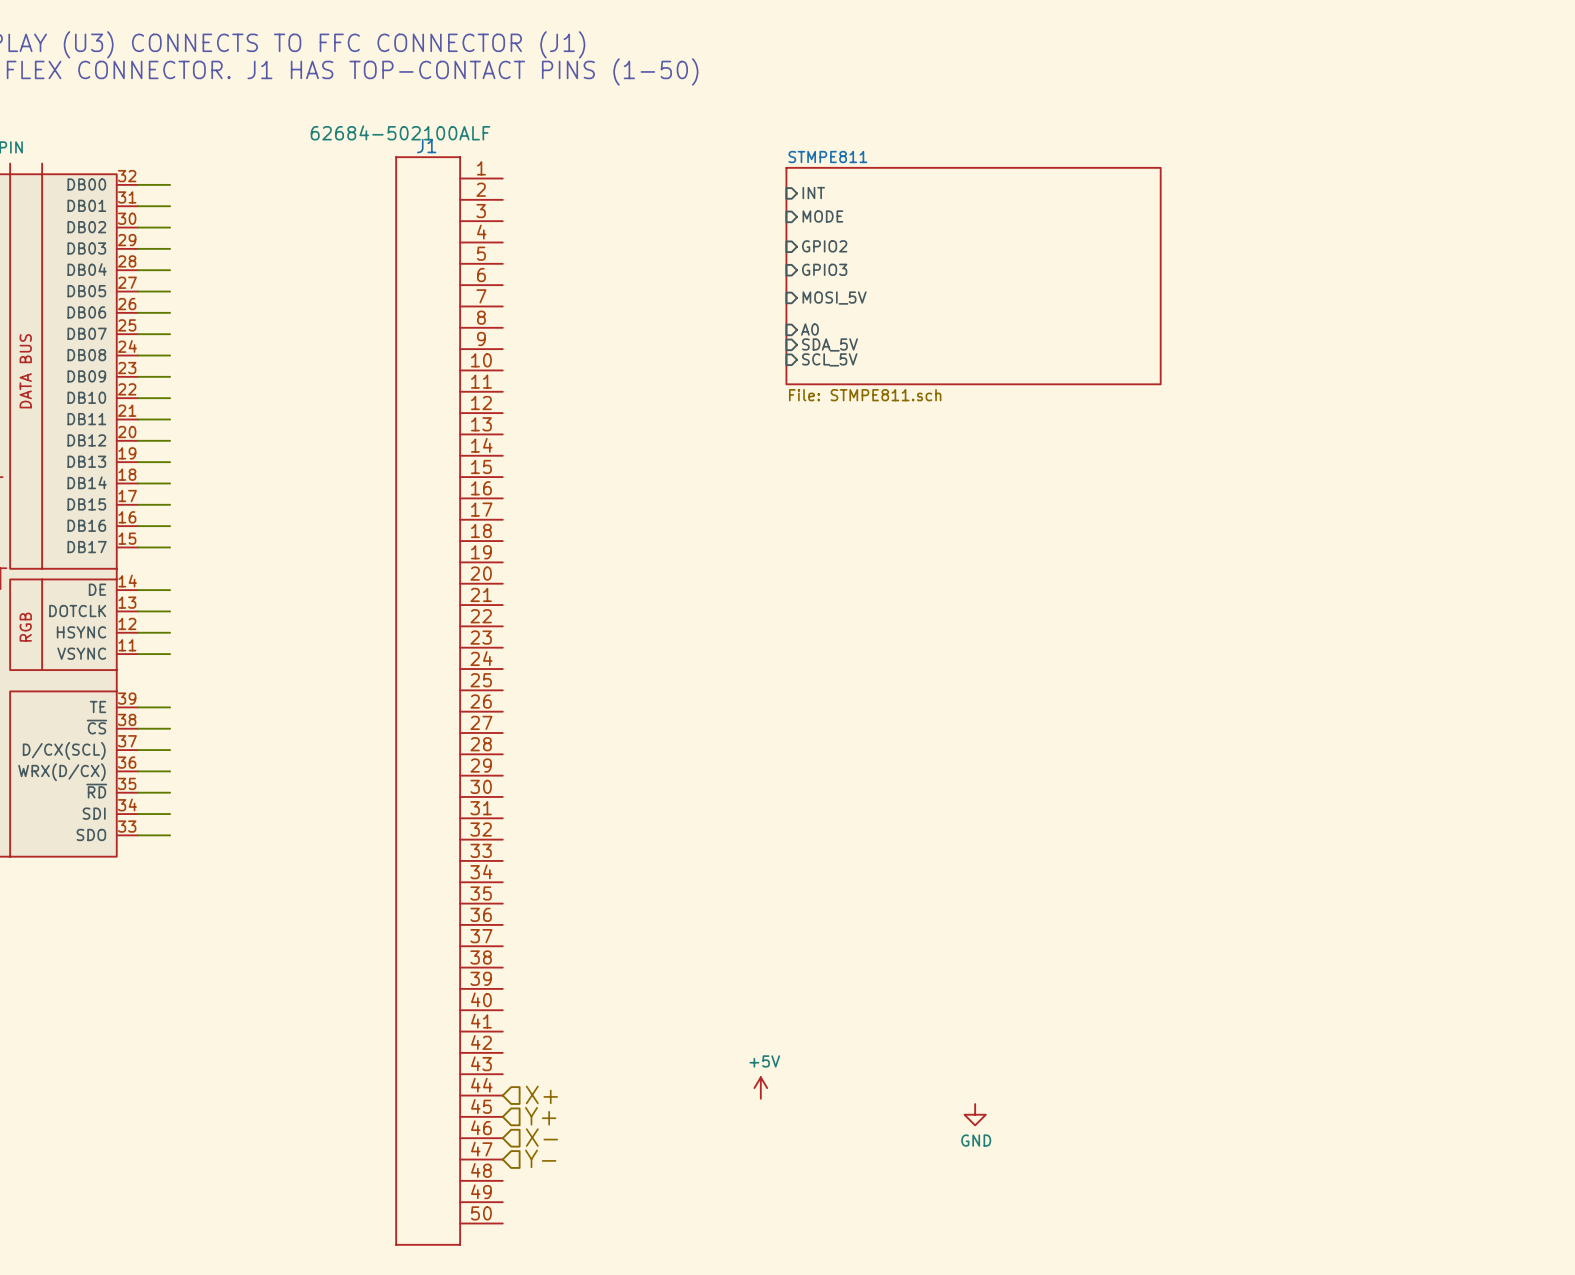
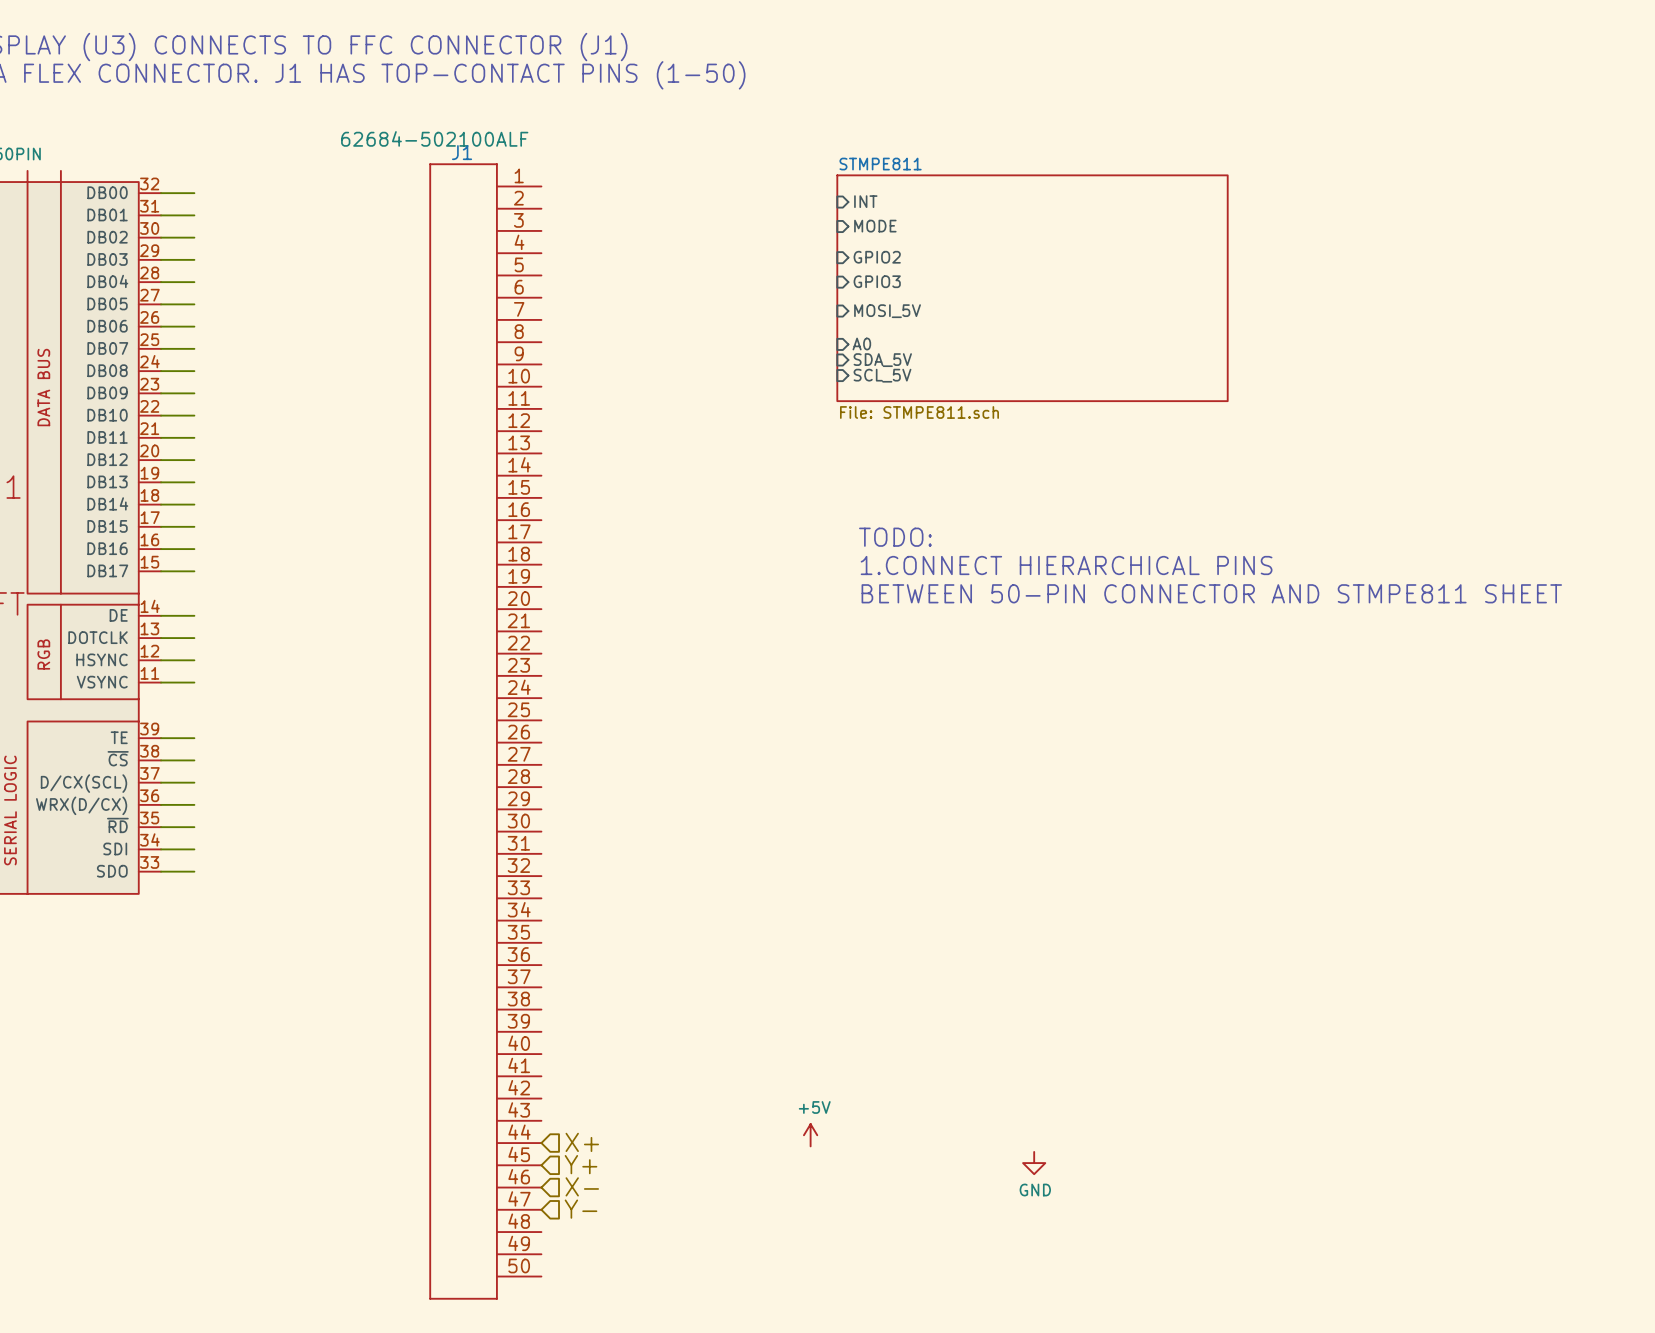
text: none -> TODO: (895, 537)
text: none -> 1.CONNECT HIERARCHICAL PINS (1066, 565)
text: none -> BETWEEN 50-PIN CONNECTOR AND STMPE811 SHEET (1211, 593)

